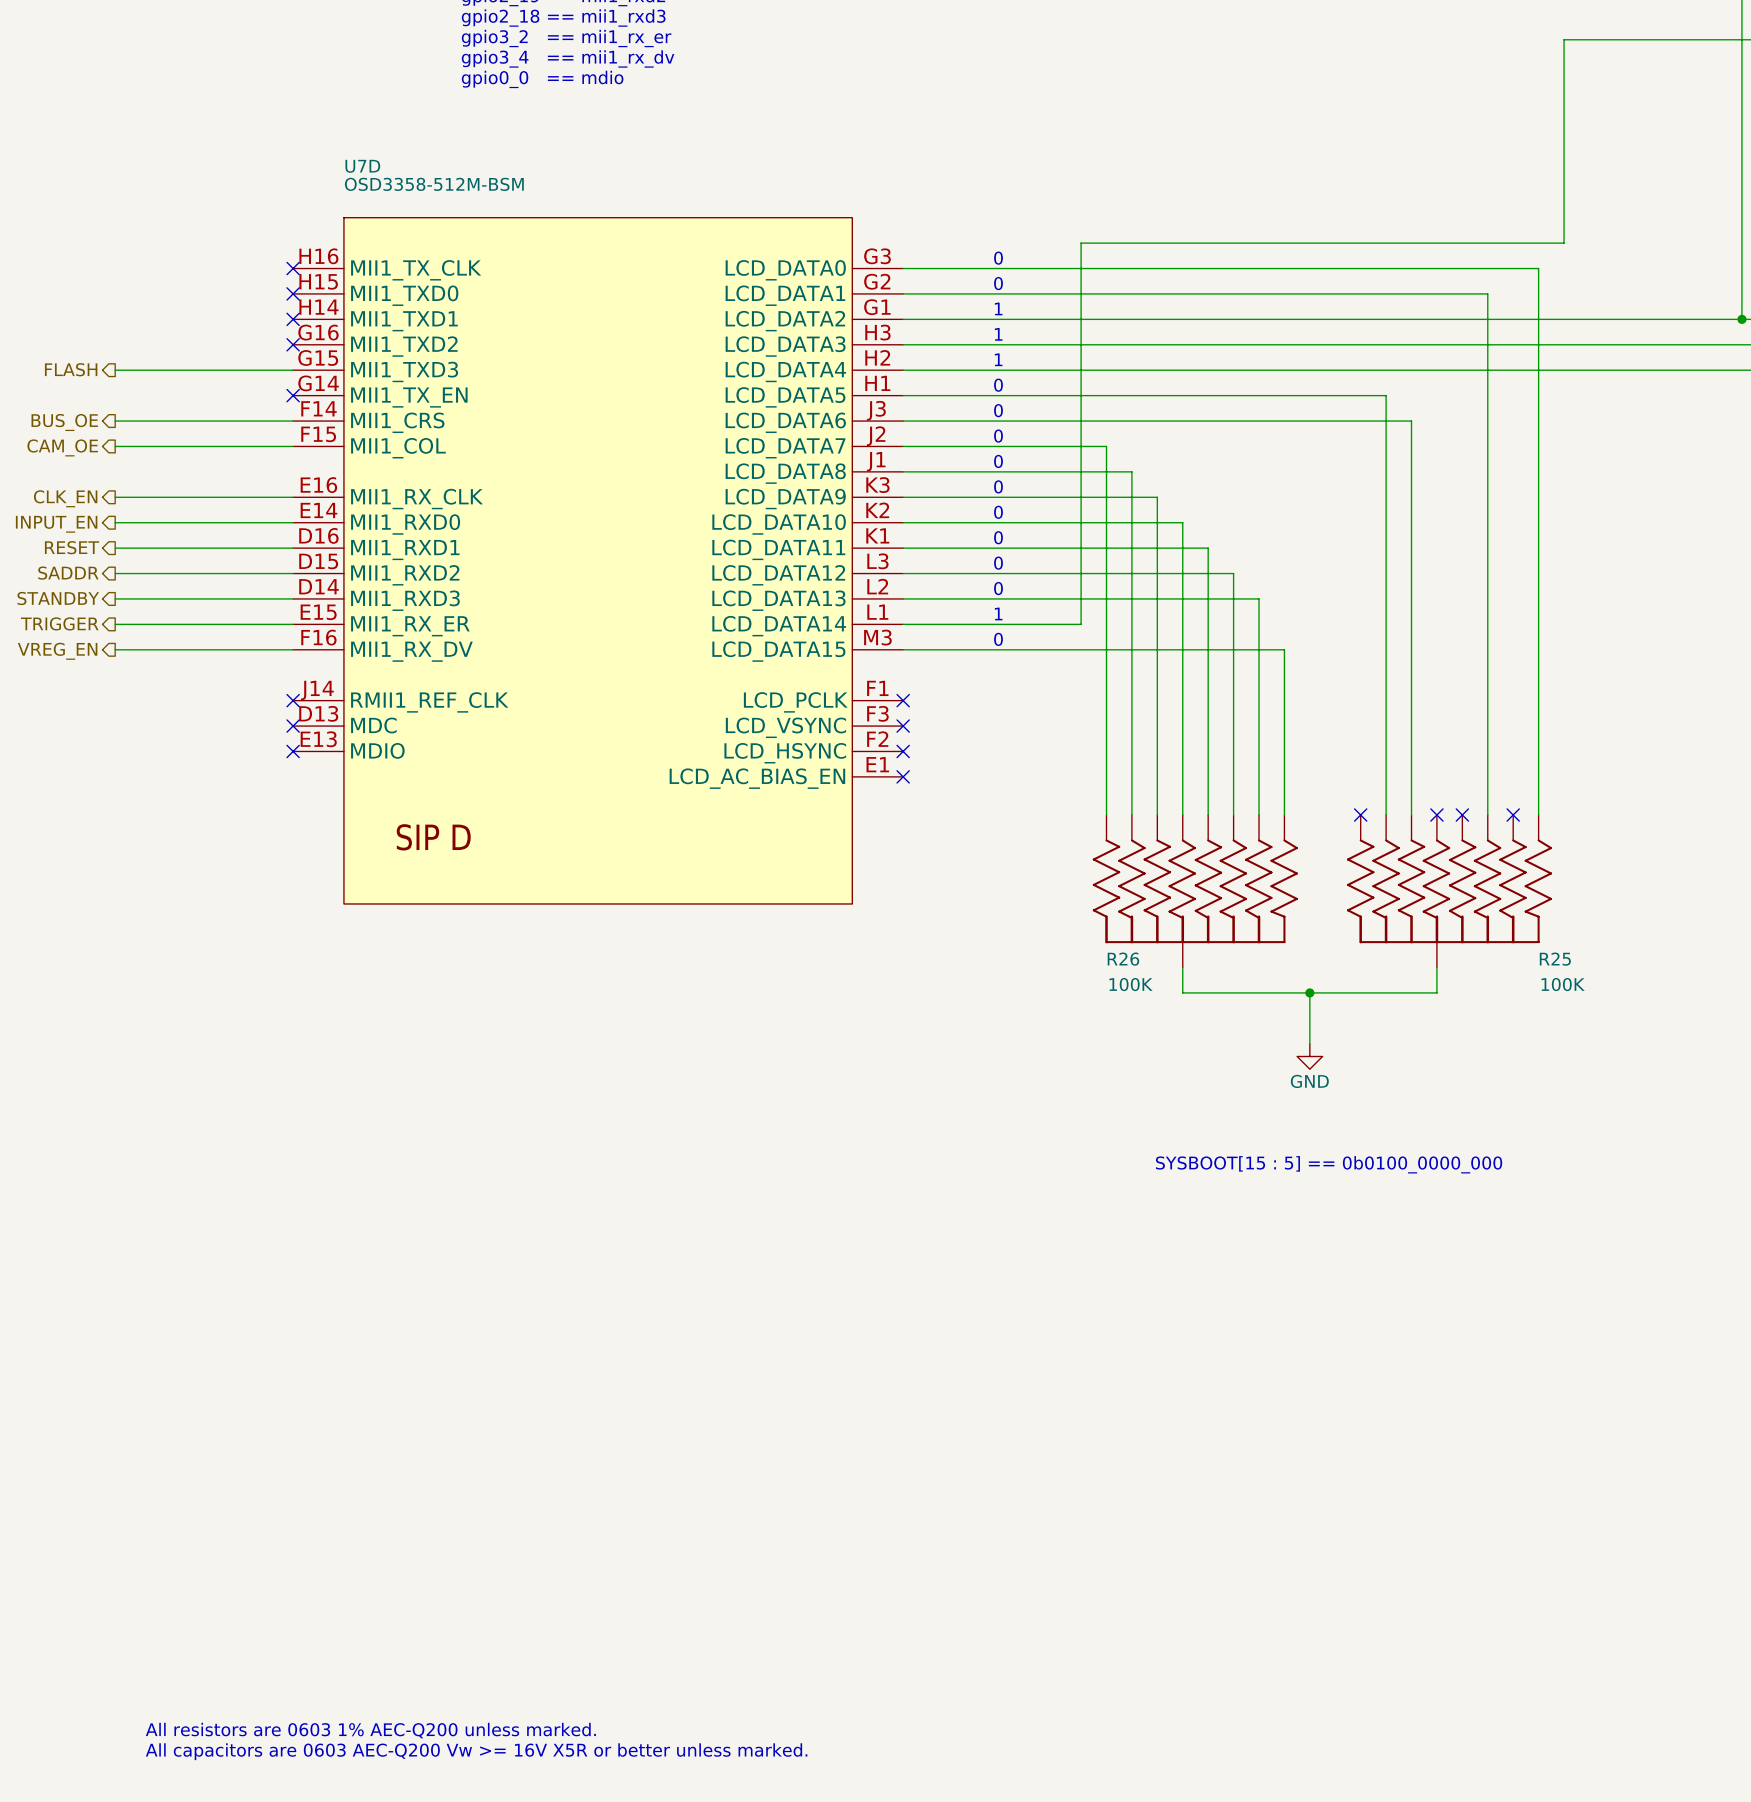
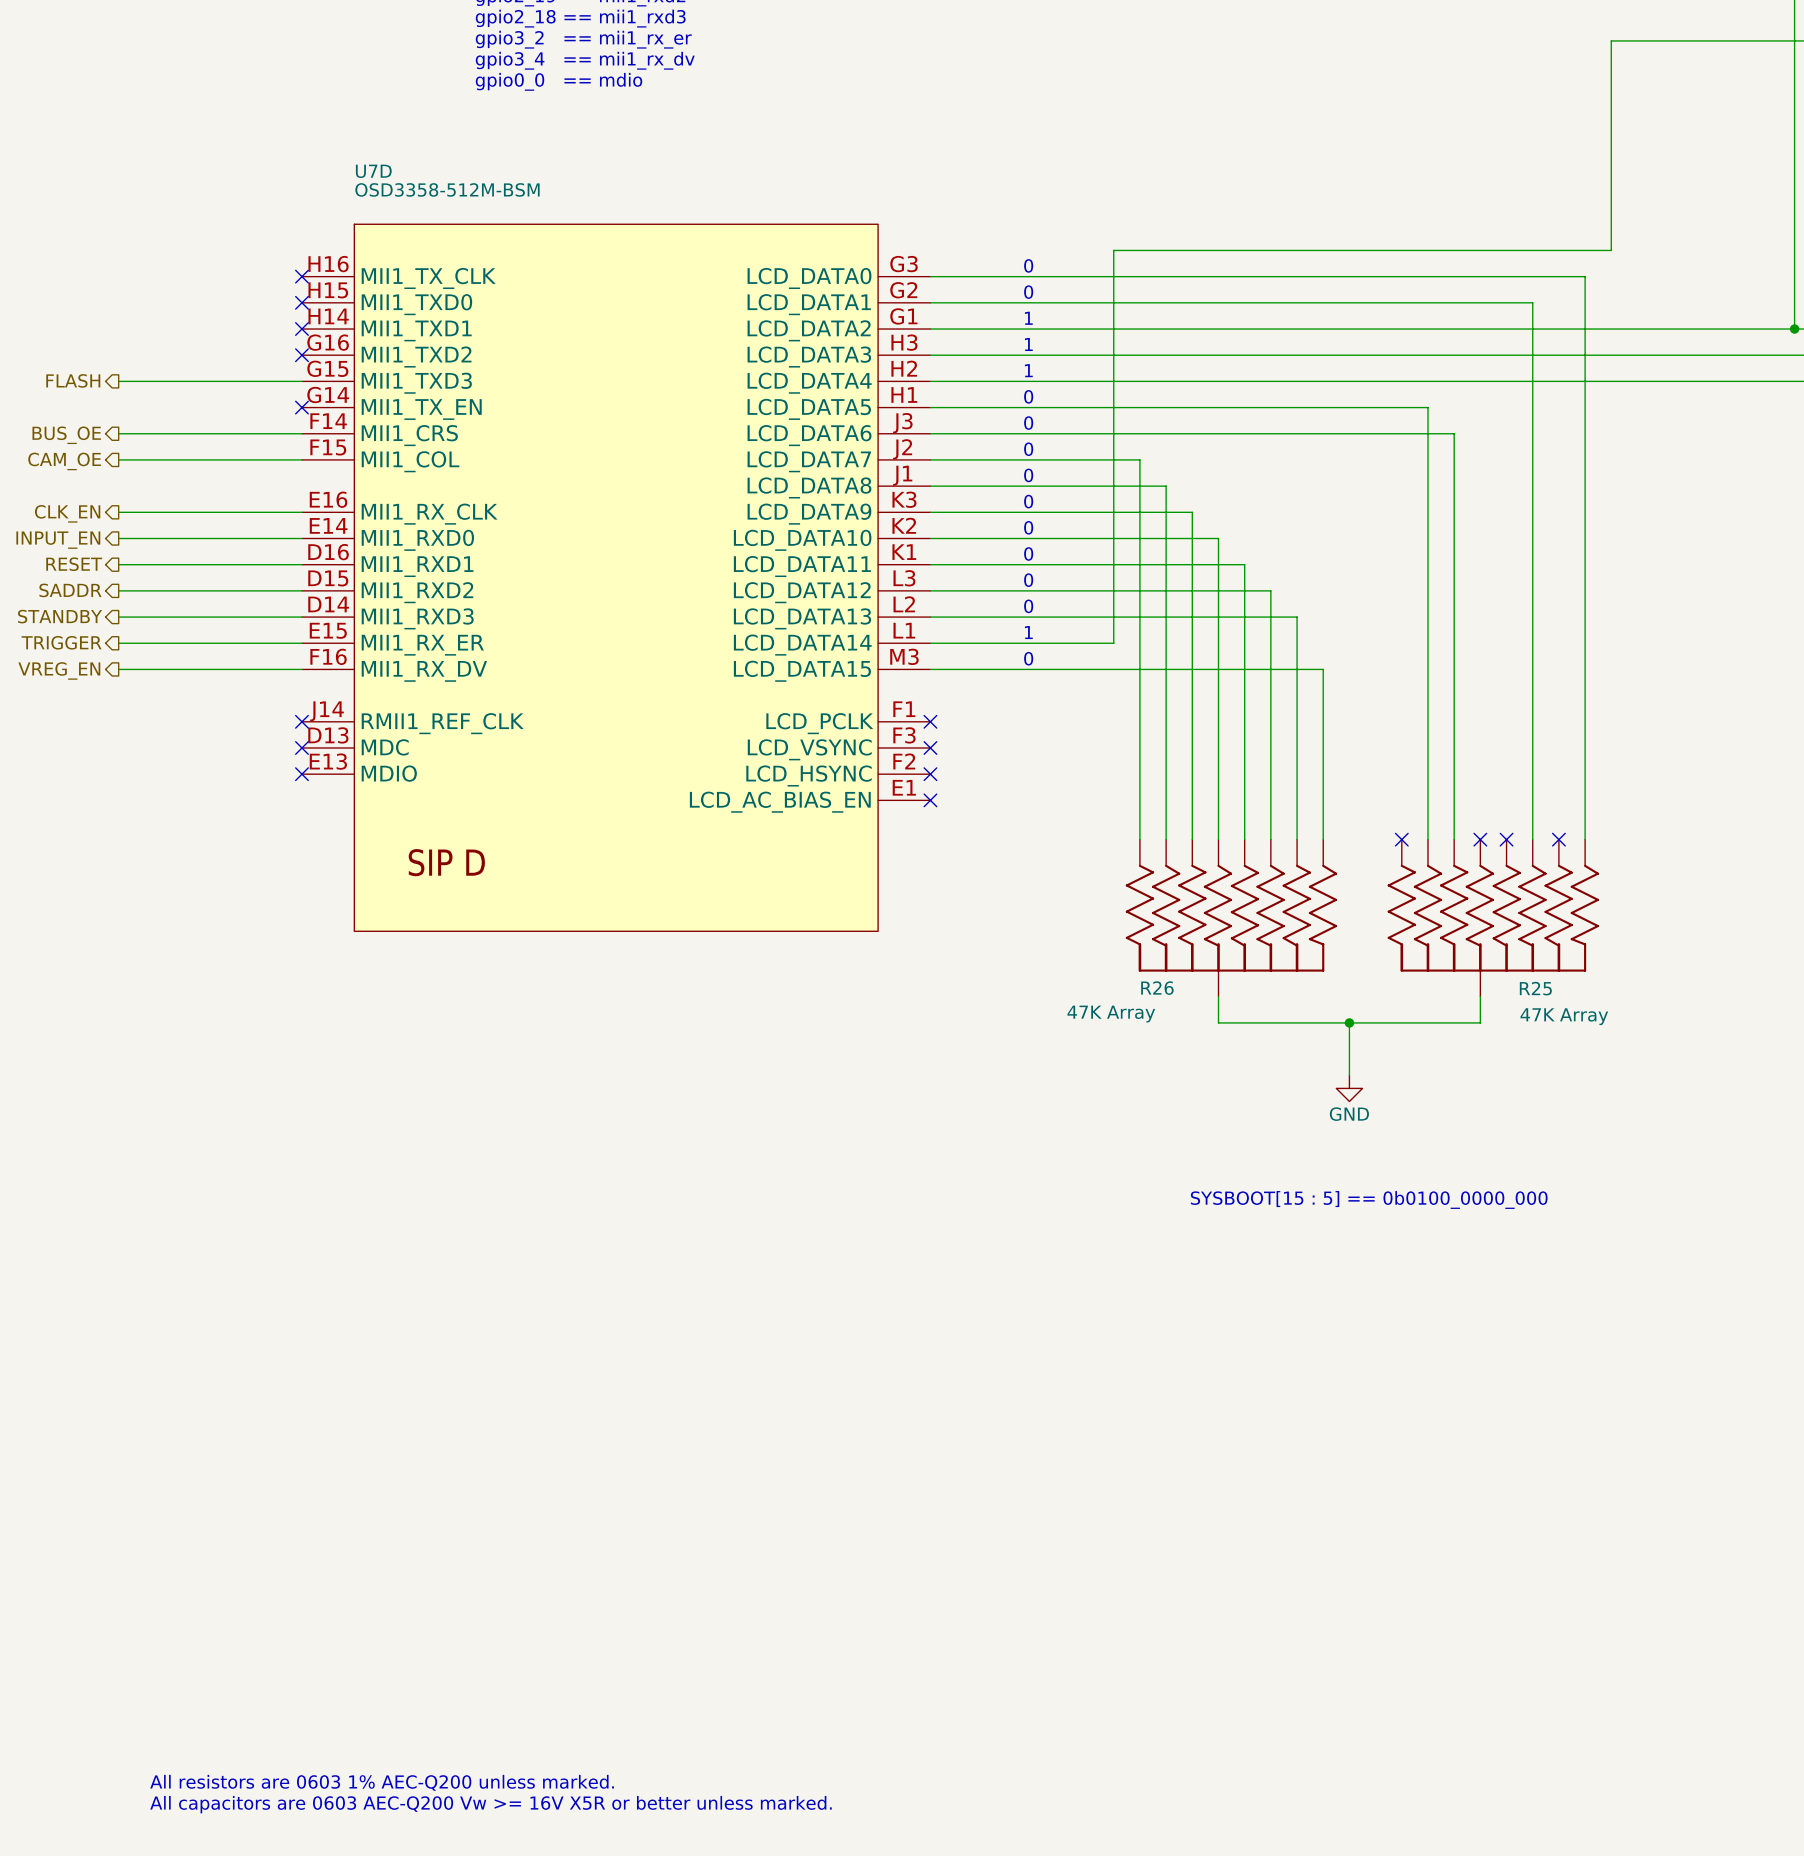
R25 name position: R25 (1555, 959) -> R25 (1535, 988)
R26 value: 100K (1131, 984) -> 47K Array (1111, 1014)
R25 value: 100K (1563, 984) -> 47K Array (1564, 1016)

